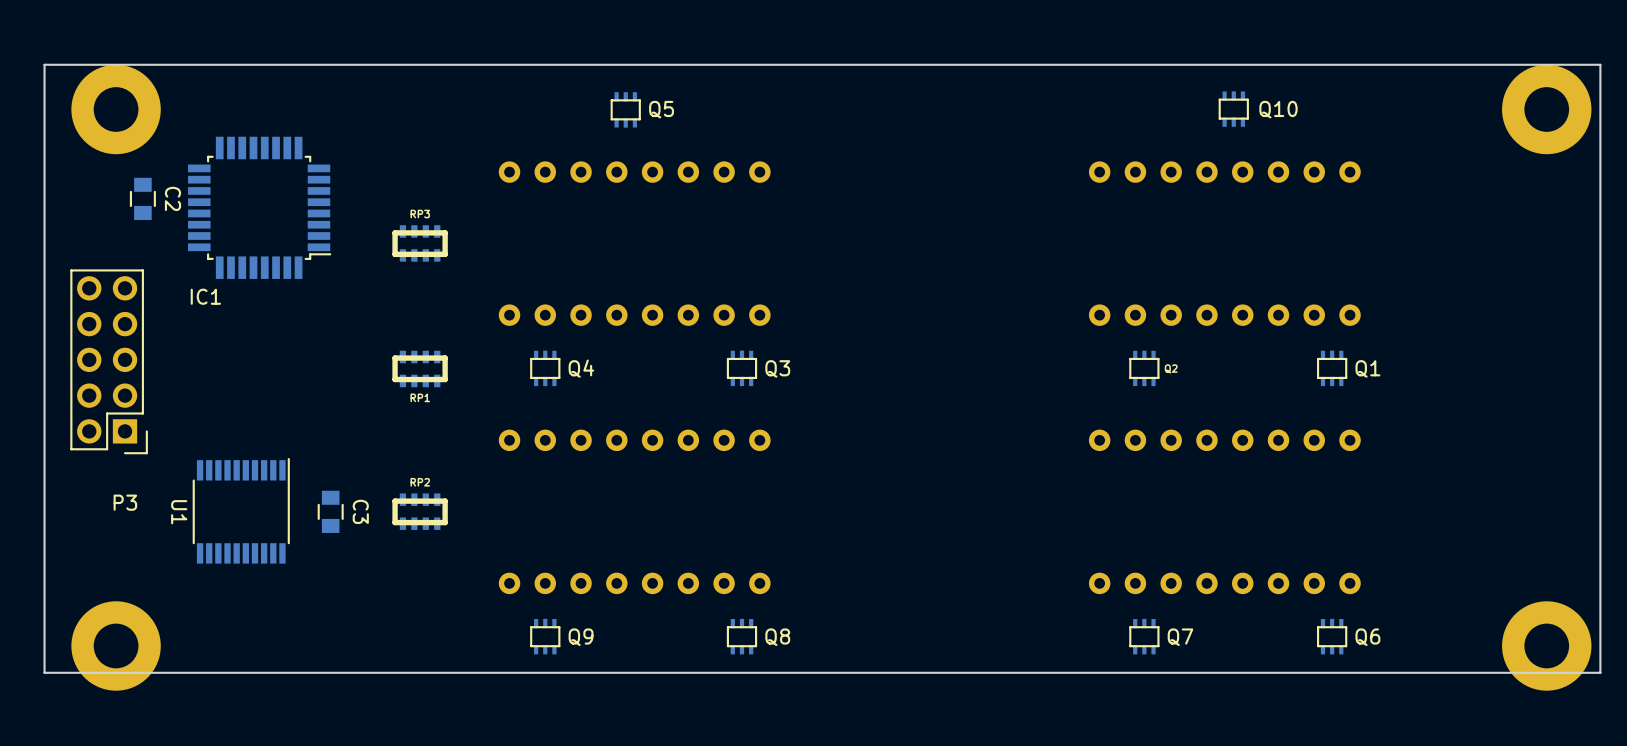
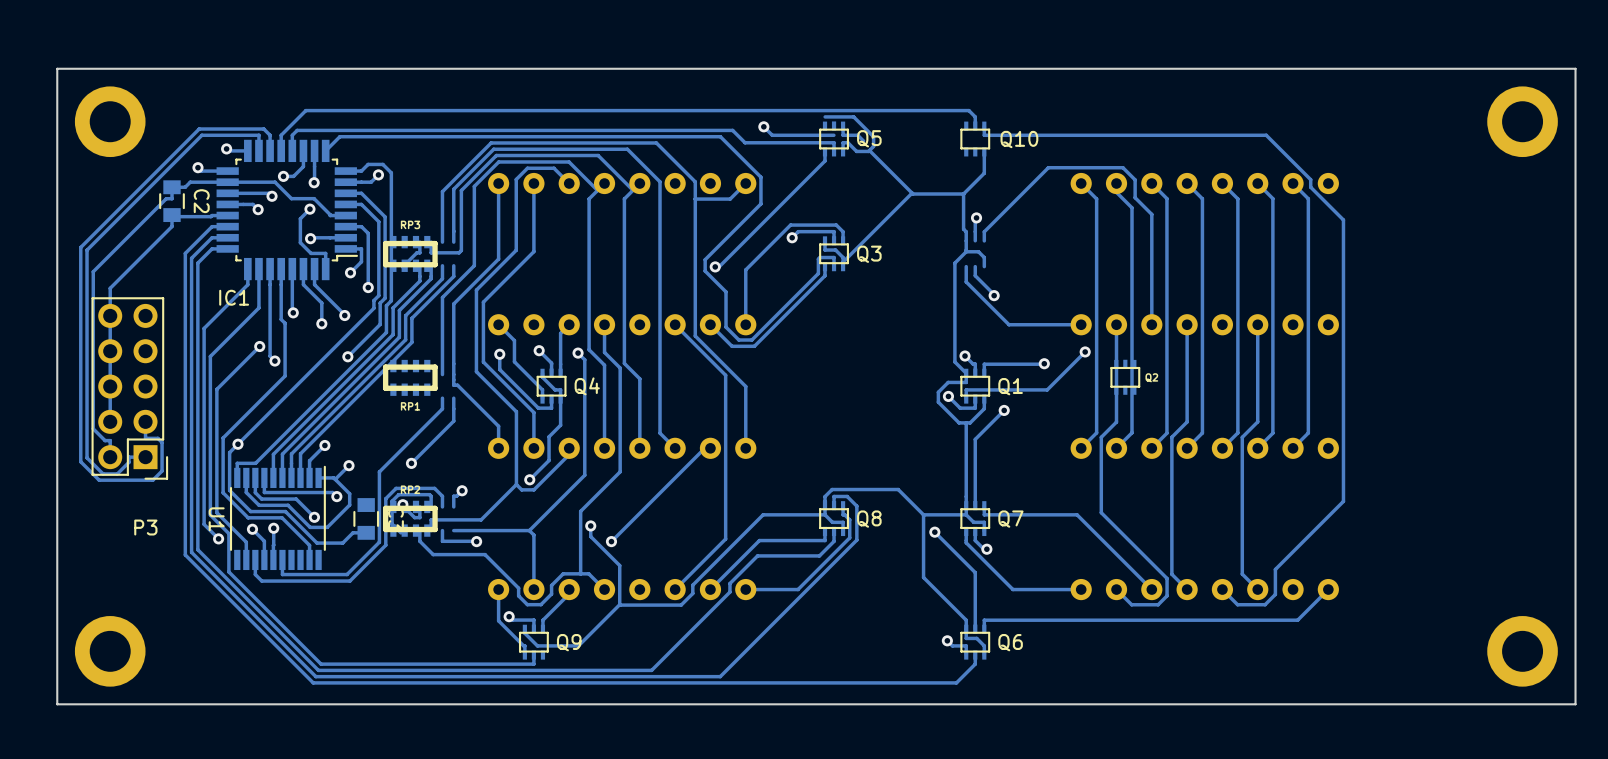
part footprint: [71, 64, 161, 155] -> [74, 86, 146, 158]
part footprint: [1502, 64, 1592, 155] -> [1487, 86, 1558, 158]
board edge: (1600, 64) (44, 64) (44, 672) (1600, 672) -> (1575, 77) (1575, 68) (57, 68) (57, 704) (1575, 704) (1575, 677)
track: none -> (825, 116) (853, 116) (873, 136) (873, 146) (868, 151) (856, 151) (847, 142) (843, 142) (843, 151)
Q5 position: (625, 109) -> (834, 138)
Q10 position: (1233, 109) -> (975, 138)
track: none -> (843, 126) (843, 135) (857, 135) (863, 140)
track: none -> (975, 126) (975, 116) (968, 110) (305, 110) (281, 135) (281, 150)
track: none -> (984, 126) (984, 135) (1266, 135) (1310, 179) (1310, 187) (1343, 220) (1343, 501) (1275, 569) (1275, 594) (1265, 604) (1237, 604) (1222, 589)
track: none -> (763, 126) (772, 135) (833, 135)
via: none -> (763, 126)
track: none -> (226, 148) (228, 150) (247, 150)
via: none -> (226, 148)
track: none -> (869, 150) (912, 194) (963, 194)
track: none -> (258, 150) (258, 135) (201, 135) (87, 250) (87, 457) (103, 473) (117, 473) (129, 462) (129, 457) (145, 457)
track: none -> (270, 150) (270, 135) (263, 129) (199, 129) (80, 247) (80, 461) (99, 480) (152, 480) (162, 471) (162, 442) (157, 438) (145, 438) (145, 421)
track: none -> (292, 150) (292, 135) (297, 130) (732, 130) (745, 142) (834, 142) (834, 151)
track: none -> (303, 150) (303, 166) (293, 176) (283, 176)
track: none -> (314, 150) (314, 182)
track: none -> (325, 150) (339, 136) (720, 136) (760, 177) (760, 203) (705, 259) (705, 271) (726, 291) (726, 327) (738, 340) (751, 340) (818, 273) (820, 257) (834, 257) (834, 266)
track: none -> (825, 151) (825, 160) (719, 266) (715, 266)
track: none -> (984, 151) (984, 173) (963, 194)
track: none -> (197, 167) (201, 171) (227, 171)
via: none -> (197, 167)
track: none -> (345, 171) (361, 171) (368, 164) (382, 164) (391, 172) (391, 300) (386, 305) (386, 332) (255, 463) (237, 463) (237, 477)
track: none -> (378, 174) (371, 182) (345, 182)
via: none -> (378, 174)
via: none -> (283, 176)
via: none -> (314, 182)
track: none -> (498, 183) (498, 259) (453, 303) (453, 385) (457, 385) (498, 426) (498, 448)
track: none -> (533, 183) (533, 251) (483, 302) (483, 362) (533, 412) (533, 448)
track: none -> (569, 183) (553, 168) (527, 168) (516, 179) (516, 250) (476, 290) (476, 371) (516, 411) (516, 484)
track: none -> (604, 183) (589, 198) (589, 349) (604, 365) (604, 448)
track: none -> (639, 183) (624, 198) (624, 363) (639, 378) (639, 448)
track: none -> (745, 183) (730, 199) (695, 199)
track: none -> (1081, 183) (1096, 198) (1096, 432) (1081, 448)
track: none -> (1116, 183) (1116, 192) (1132, 207) (1132, 432) (1116, 448)
track: none -> (1151, 183) (1166, 198) (1166, 433) (1151, 448)
track: none -> (1187, 183) (1202, 198) (1202, 433) (1187, 448)
track: none -> (1222, 183) (1237, 198) (1237, 432) (1222, 448)
track: none -> (1257, 183) (1272, 198) (1272, 433) (1257, 448)
track: none -> (1293, 183) (1308, 198) (1308, 433) (1293, 448)
track: none -> (633, 190) (598, 155) (496, 155) (461, 190) (461, 250) (459, 252) (431, 252) (431, 242)
track: none -> (597, 190) (569, 161) (498, 161) (474, 186) (474, 265) (442, 297) (442, 374)
track: none -> (912, 193) (843, 262)
track: none -> (227, 193) (269, 193) (272, 196)
track: none -> (345, 193) (361, 193) (385, 216) (385, 298) (380, 303) (380, 324) (347, 356)
track: none -> (963, 194) (963, 229) (966, 231) (966, 251)
via: none -> (272, 196)
track: none -> (227, 204) (252, 204) (258, 209)
track: none -> (345, 204) (361, 204) (378, 221) (378, 295) (373, 300) (373, 308) (229, 452) (229, 490) (250, 511) (285, 511) (317, 543) (342, 543) (352, 532) (366, 532)
C2 position: (142, 198) -> (172, 201)
via: none -> (258, 209)
track: none -> (309, 209) (300, 218) (300, 242) (311, 253) (325, 253) (325, 269)
via: none -> (309, 209)
track: none -> (172, 215) (172, 226) (110, 288) (110, 421)
track: none -> (227, 215) (172, 216)
track: none -> (345, 215) (330, 215) (314, 198) (291, 198) (275, 182) (190, 182) (185, 187) (172, 187) (172, 198) (166, 198) (93, 271) (93, 428) (105, 440) (110, 440) (110, 457)
track: none -> (976, 217) (975, 240)
via: none -> (976, 217)
IC1 position: (259, 207) -> (287, 209)
track: none -> (227, 226) (212, 226) (185, 253) (185, 554) (313, 682) (956, 682) (975, 664) (975, 655)
track: none -> (345, 226) (361, 226) (368, 233) (368, 287)
track: none -> (227, 237) (212, 237) (191, 258) (191, 552) (315, 676) (720, 676) (856, 540) (856, 506) (847, 496) (834, 496) (834, 505)
via: none -> (310, 238)
track: none -> (345, 237) (310, 238)
track: none -> (792, 237) (798, 231) (834, 231) (834, 240)
via: none -> (792, 237)
track: none -> (825, 240) (825, 250) (835, 250) (843, 257) (843, 266)
track: none -> (843, 240) (843, 231) (836, 225) (790, 225) (745, 269) (745, 324)
track: none -> (984, 240) (984, 231) (1048, 167) (1122, 167) (1135, 179) (1135, 197) (1151, 214) (1151, 324)
track: none -> (419, 242) (419, 252) (416, 252) (402, 267)
track: none -> (442, 242) (442, 191) (491, 142) (656, 142) (695, 181) (695, 336) (745, 386) (745, 448)
track: none -> (453, 242) (453, 189) (493, 149) (627, 149) (660, 181) (660, 433) (675, 448)
track: none -> (227, 248) (212, 248) (197, 263) (197, 549) (318, 670) (651, 670) (729, 592) (729, 583) (757, 555) (819, 555) (834, 541) (834, 531)
track: none -> (345, 248) (361, 248) (361, 261) (350, 272)
track: none -> (966, 251) (978, 251) (984, 257) (984, 266)
track: none -> (966, 251) (954, 263) (954, 362) (966, 373) (966, 382) (948, 382) (938, 392) (938, 402) (959, 422) (970, 422) (984, 408) (984, 399)
track: none -> (419, 265) (419, 281) (393, 307) (393, 334) (273, 454) (273, 477)
track: none -> (431, 265) (431, 278) (399, 310) (399, 337) (282, 454) (282, 477)
track: none -> (442, 265) (442, 278) (405, 315) (405, 339) (291, 453) (291, 477)
track: none -> (453, 265) (453, 276) (411, 318) (411, 342) (300, 453) (300, 477)
via: none -> (715, 266)
track: none -> (825, 266) (825, 275) (754, 346) (732, 346) (710, 324)
track: none -> (966, 266) (966, 281) (1009, 324) (1081, 324)
track: none -> (975, 266) (975, 275) (994, 295)
track: none -> (247, 269) (247, 284) (204, 328) (204, 524) (218, 538)
track: none -> (258, 269) (258, 307) (210, 356) (210, 515) (228, 533) (228, 571) (321, 664) (533, 664) (533, 655)
track: none -> (270, 269) (270, 356) (274, 361)
track: none -> (281, 269) (281, 319) (285, 323) (285, 376) (223, 438) (223, 492) (248, 517) (282, 517) (309, 545) (309, 559)
track: none -> (292, 269) (293, 312)
track: none -> (303, 269) (303, 284) (321, 303) (321, 323)
track: none -> (314, 269) (314, 284) (344, 315)
via: none -> (350, 272)
via: none -> (368, 287)
via: none -> (994, 295)
via: none -> (293, 312)
via: none -> (344, 315)
via: none -> (321, 323)
track: none -> (498, 324) (514, 340) (514, 361) (542, 389) (542, 399)
track: none -> (569, 324) (560, 333) (560, 373)
track: none -> (604, 324) (604, 352) (620, 368) (620, 471) (580, 511) (580, 573)
track: none -> (675, 324) (725, 375) (725, 539) (675, 589)
track: none -> (1116, 324) (1116, 422) (1101, 437) (1101, 512) (1167, 578) (1167, 595) (1158, 604) (1131, 604) (1116, 589)
track: none -> (1187, 324) (1187, 421) (1171, 437) (1171, 574) (1187, 589)
track: none -> (1257, 324) (1257, 421) (1242, 437) (1242, 574) (1257, 589)
track: none -> (259, 346) (216, 389) (216, 512) (246, 542) (246, 559)
via: none -> (259, 346)
track: none -> (539, 350) (551, 363) (551, 373)
via: none -> (539, 350)
track: none -> (1085, 351) (1047, 389) (966, 389) (966, 399)
via: none -> (1085, 351)
track: none -> (578, 353) (584, 359) (584, 475) (529, 530)
via: none -> (578, 353)
track: none -> (499, 354) (499, 369) (538, 408) (551, 408) (551, 399)
via: none -> (499, 354)
track: none -> (965, 356) (975, 364) (975, 373)
via: none -> (965, 356)
via: none -> (347, 356)
via: none -> (274, 361)
track: none -> (1044, 363) (984, 364) (984, 373)
via: none -> (1044, 363)
P3 position: (109, 361) -> (129, 388)
track: none -> (542, 373) (542, 377) (555, 389) (560, 389) (560, 425) (549, 436) (549, 460) (529, 479)
Q4 position: (545, 368) -> (551, 386)
Q3 position: (741, 368) -> (834, 253)
Q1 position: (1332, 368) -> (975, 386)
track: none -> (948, 396) (960, 408) (975, 408) (975, 399)
via: none -> (948, 396)
track: none -> (442, 398) (442, 408) (379, 471) (379, 542) (347, 574) (282, 574) (282, 559)
track: none -> (453, 398) (453, 421) (411, 463)
track: none -> (1004, 410) (975, 439) (975, 505)
via: none -> (1004, 410)
track: none -> (966, 422) (966, 514)
via: none -> (237, 444)
track: none -> (324, 445) (309, 460) (309, 477)
via: none -> (324, 445)
track: none -> (569, 448) (569, 454) (533, 489) (521, 489) (516, 484)
track: none -> (710, 448) (704, 448) (611, 541)
via: none -> (411, 463)
track: none -> (349, 465) (335, 479)
via: none -> (349, 465)
track: none -> (255, 477) (255, 492) (261, 499) (296, 499) (314, 517)
track: none -> (264, 477) (264, 492) (332, 492) (336, 496)
track: none -> (318, 477) (333, 477) (349, 493) (349, 505) (327, 527) (310, 527) (288, 505) (259, 505) (246, 492) (246, 477)
via: none -> (529, 479)
track: none -> (516, 484) (481, 519) (431, 519) (431, 530)
track: none -> (462, 490) (456, 496) (453, 496) (453, 506)
via: none -> (462, 490)
via: none -> (336, 496)
track: none -> (402, 504) (414, 517) (419, 517) (419, 506)
via: none -> (402, 504)
track: none -> (843, 505) (843, 514) (849, 519) (849, 537) (798, 589) (745, 589)
track: none -> (984, 505) (984, 514) (1077, 514) (1151, 589)
track: none -> (431, 506) (429, 494) (398, 494) (392, 501) (392, 523) (400, 532)
track: none -> (442, 506) (442, 496) (434, 488) (396, 488) (385, 498) (385, 545) (349, 581) (261, 581) (255, 574) (255, 559)
track: none -> (825, 514) (832, 522) (843, 522) (843, 531)
track: none -> (825, 514) (763, 514) (692, 585) (692, 593) (681, 605) (619, 604)
track: none -> (923, 514) (923, 577) (966, 620) (966, 638) (976, 638) (984, 645) (984, 655)
track: none -> (923, 514) (898, 489) (832, 489) (825, 496) (825, 514)
track: none -> (966, 514) (923, 514)
track: none -> (966, 514) (973, 522) (984, 522) (984, 531)
U1 position: (241, 510) -> (277, 517)
via: none -> (314, 517)
C3 position: (330, 511) -> (366, 518)
track: none -> (590, 525) (590, 536) (619, 565) (619, 604)
via: none -> (590, 525)
track: none -> (273, 528) (273, 559)
via: none -> (273, 528)
track: none -> (252, 529) (264, 541) (264, 559)
via: none -> (252, 529)
track: none -> (419, 530) (419, 541) (433, 554) (485, 554) (518, 588) (518, 595) (527, 604) (540, 604) (551, 594) (551, 585) (563, 573) (588, 573) (604, 589)
track: none -> (442, 530) (442, 541) (476, 541)
track: none -> (529, 530) (533, 535) (533, 589)
track: none -> (529, 530) (453, 530)
track: none -> (825, 531) (825, 540) (759, 540) (710, 589)
track: none -> (966, 531) (966, 542) (1012, 589) (1081, 589)
track: none -> (975, 531) (975, 540) (983, 549) (986, 549)
track: none -> (934, 532) (975, 572) (975, 629)
via: none -> (934, 532)
via: none -> (218, 538)
via: none -> (476, 541)
via: none -> (611, 541)
via: none -> (986, 549)
track: none -> (498, 589) (498, 620) (524, 645) (524, 655)
track: none -> (569, 589) (569, 593) (542, 620) (542, 629)
track: none -> (1328, 589) (1297, 620) (984, 620) (984, 629)
track: none -> (619, 604) (578, 645) (537, 645) (524, 633) (524, 629)
part footprint: [71, 601, 161, 691] -> [74, 616, 146, 687]
part footprint: [1502, 601, 1592, 691] -> [1487, 616, 1558, 687]
track: none -> (509, 616) (512, 620) (533, 620) (533, 629)
via: none -> (509, 616)
track: none -> (947, 640) (952, 645) (966, 645) (966, 655)
via: none -> (947, 640)
Q8 position: (741, 636) -> (834, 518)
Q7 position: (1144, 636) -> (975, 518)
Q6 position: (1332, 636) -> (975, 642)

